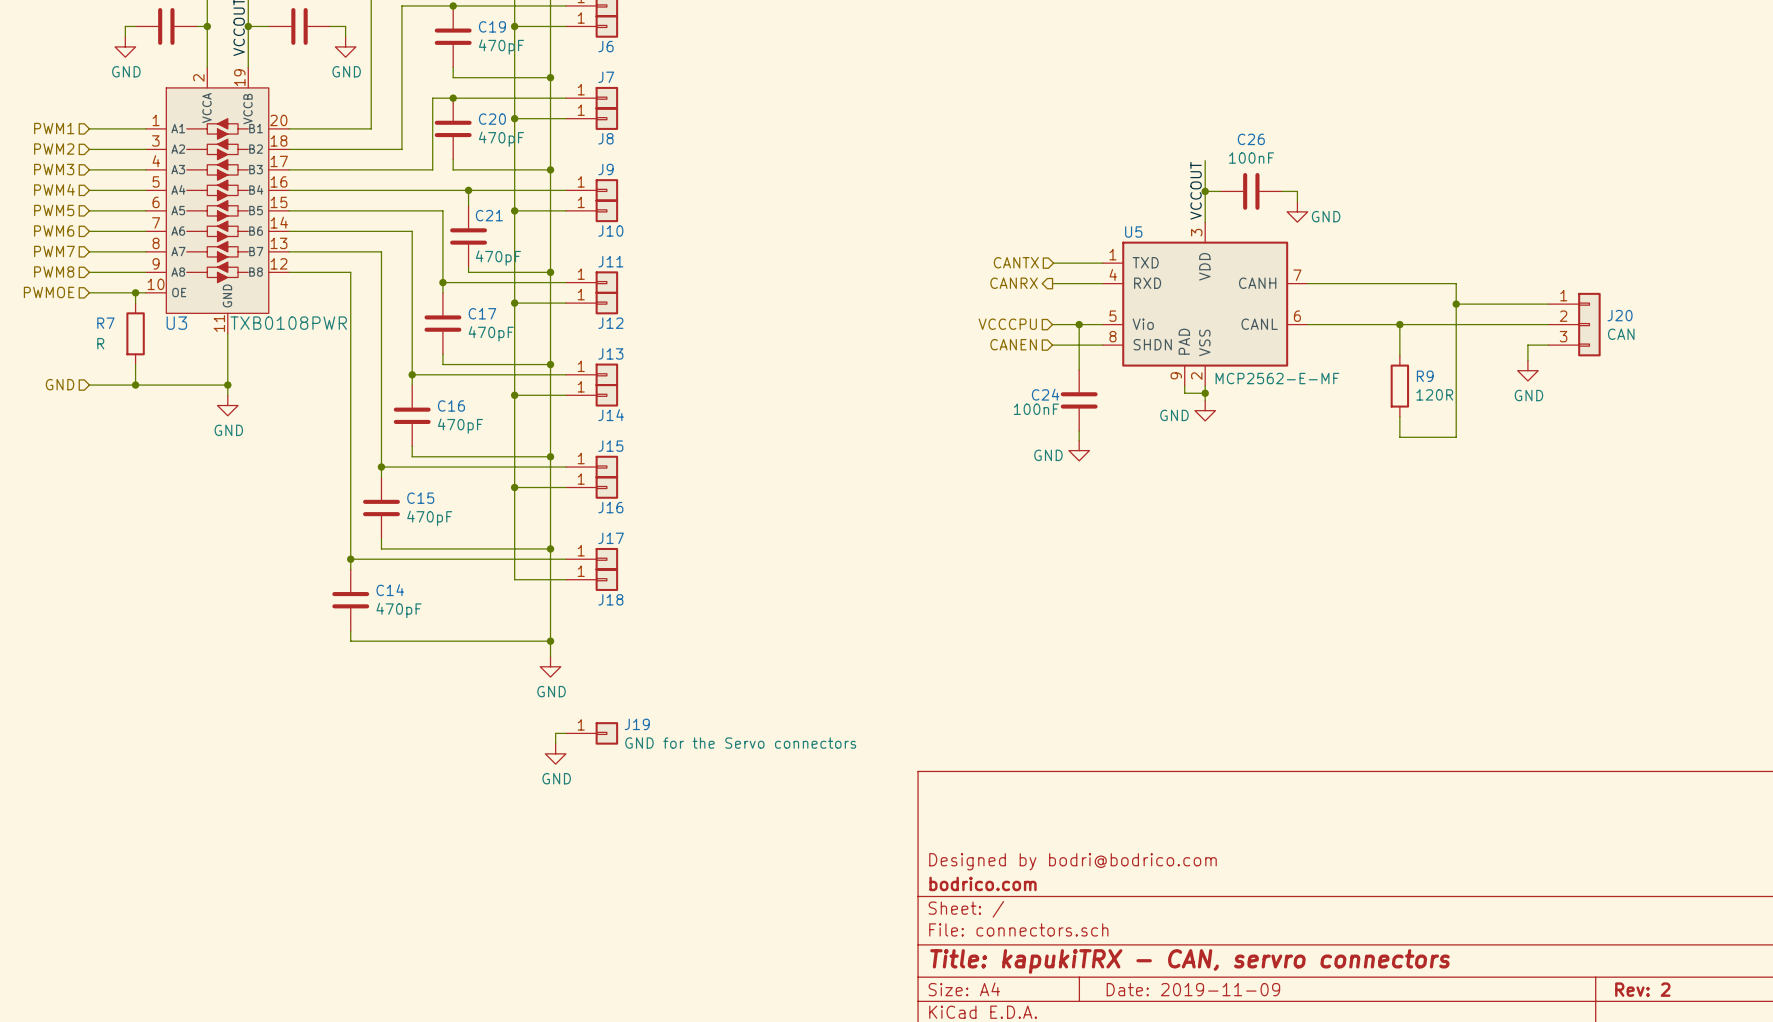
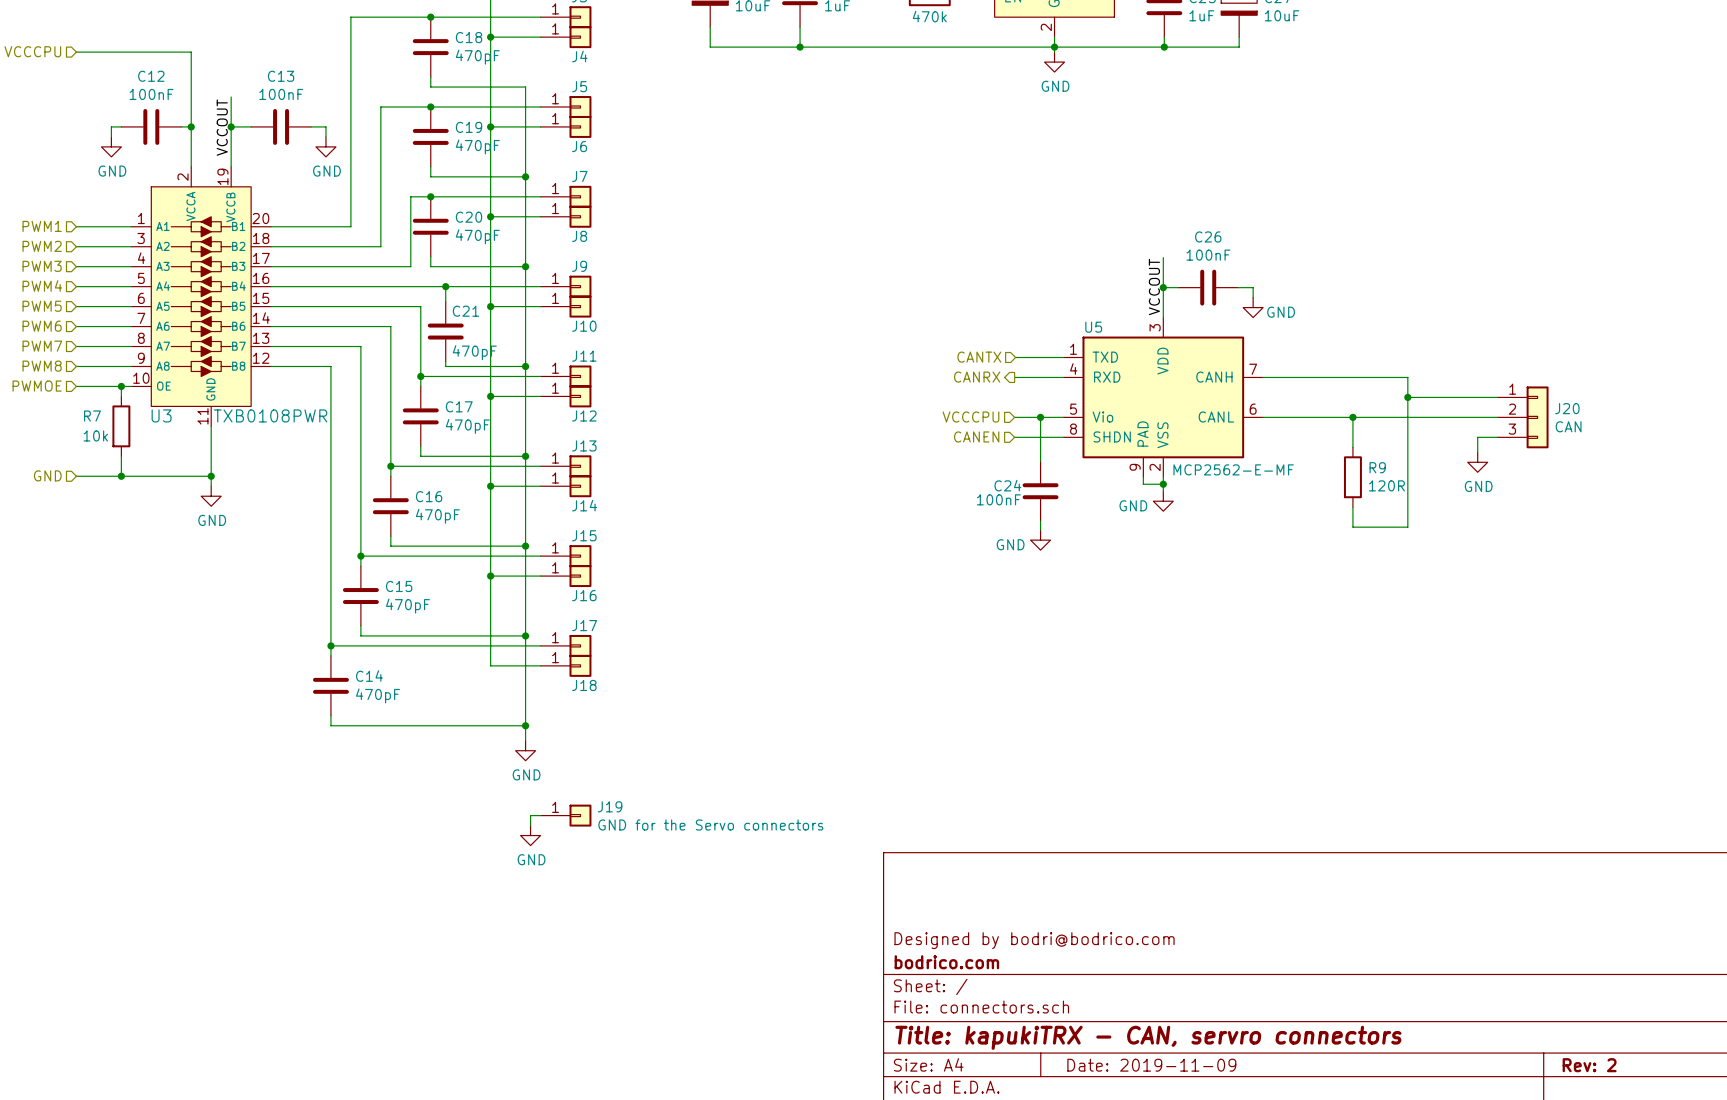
R7 value: R (100, 343) -> 10k (95, 435)

